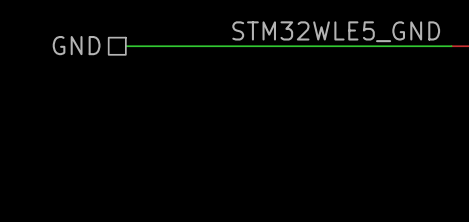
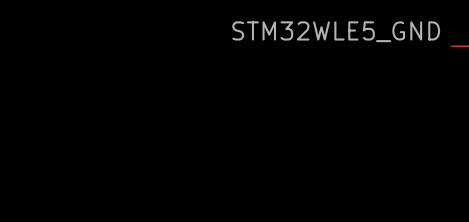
hierarchical label: GND (76, 45) -> none
wire: (125, 46) (451, 46) -> none

